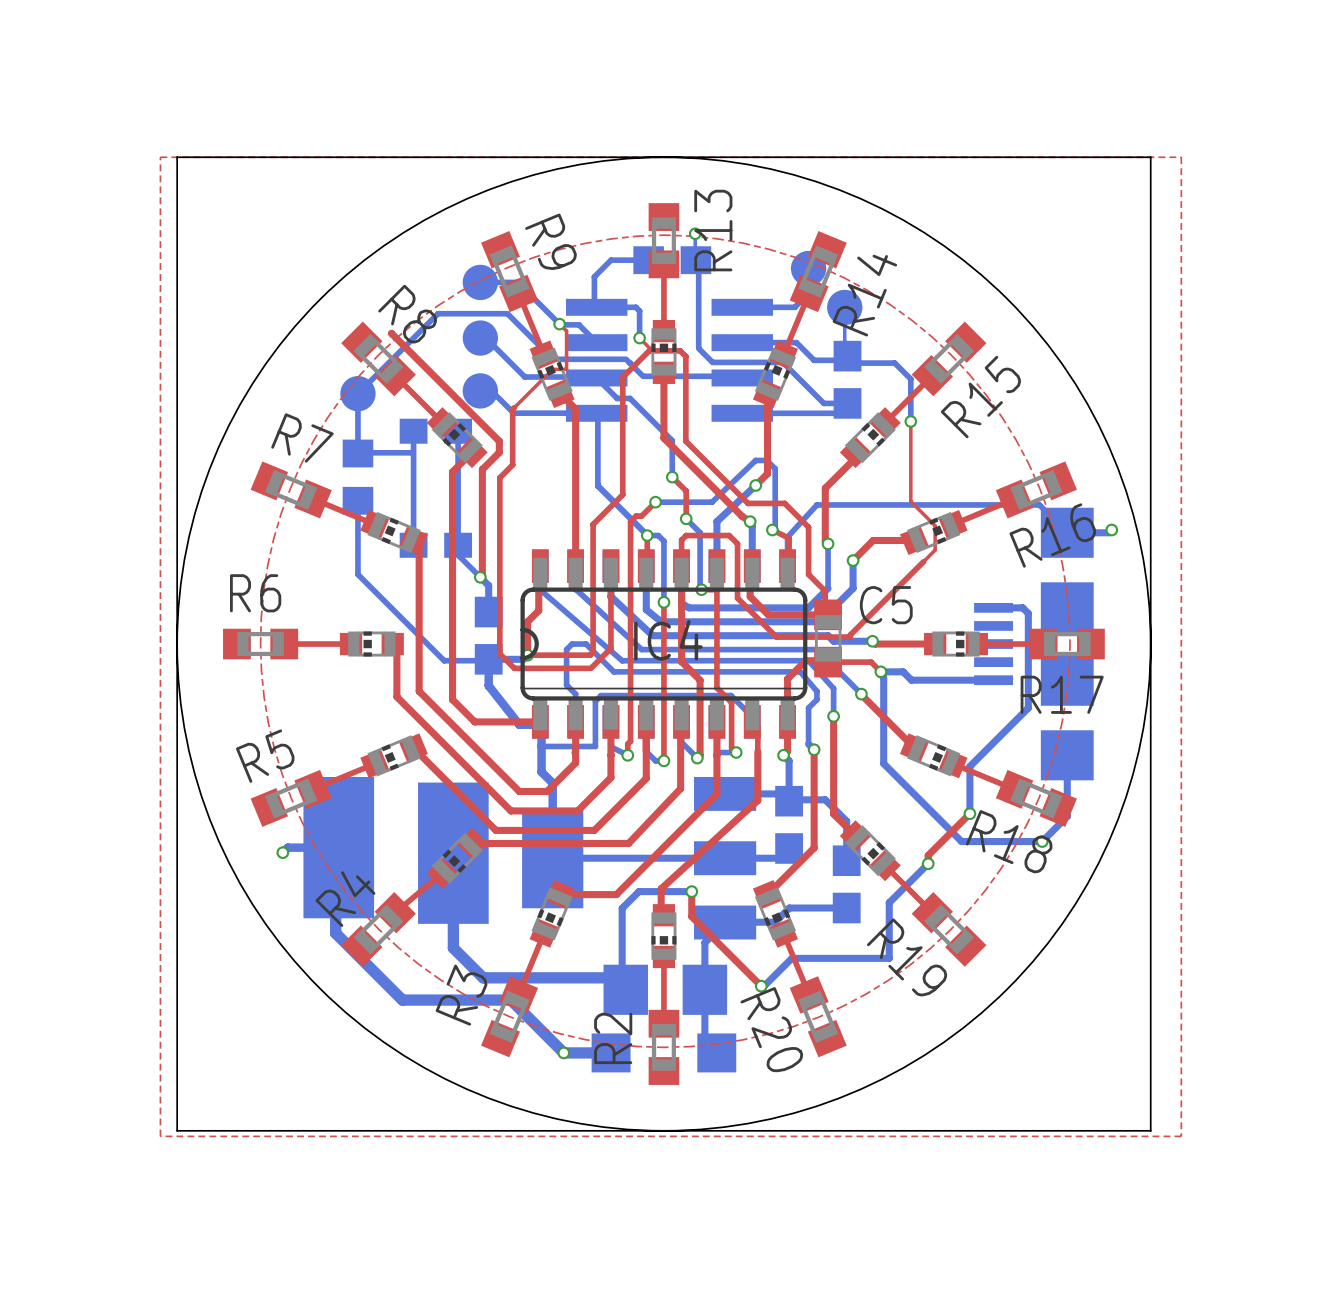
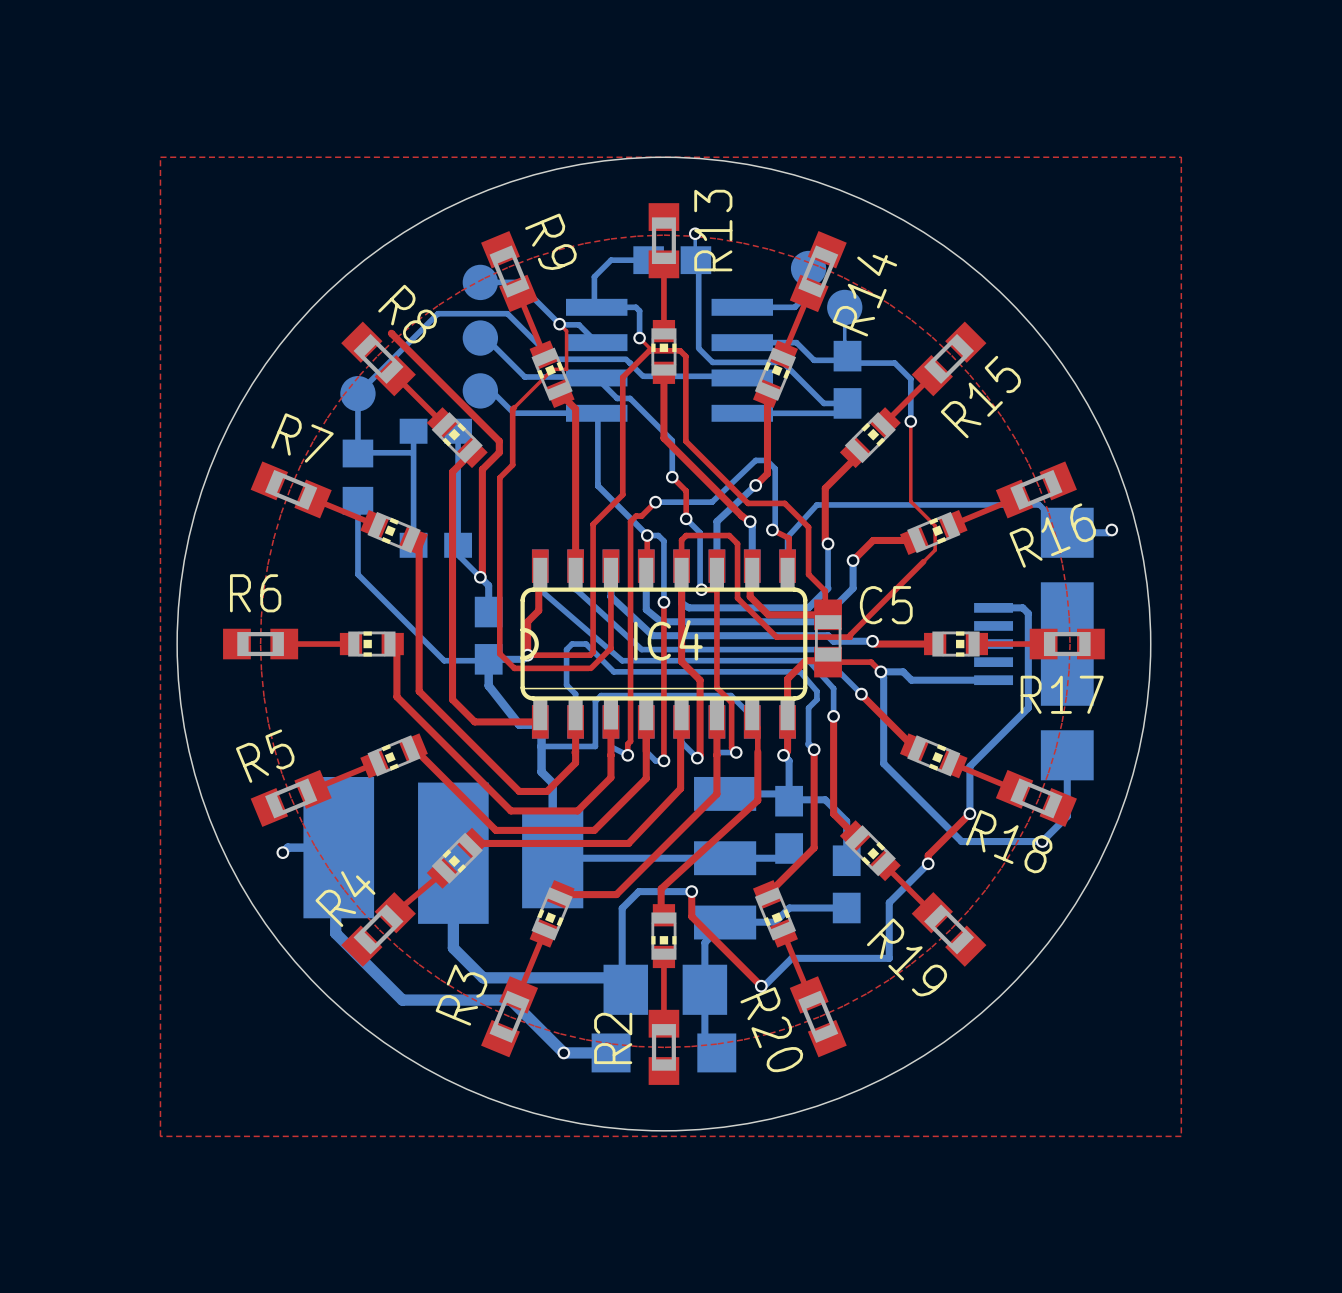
board edge: (177, 157) (1150, 157) (1150, 1130) (177, 1130) (177, 157) -> none

